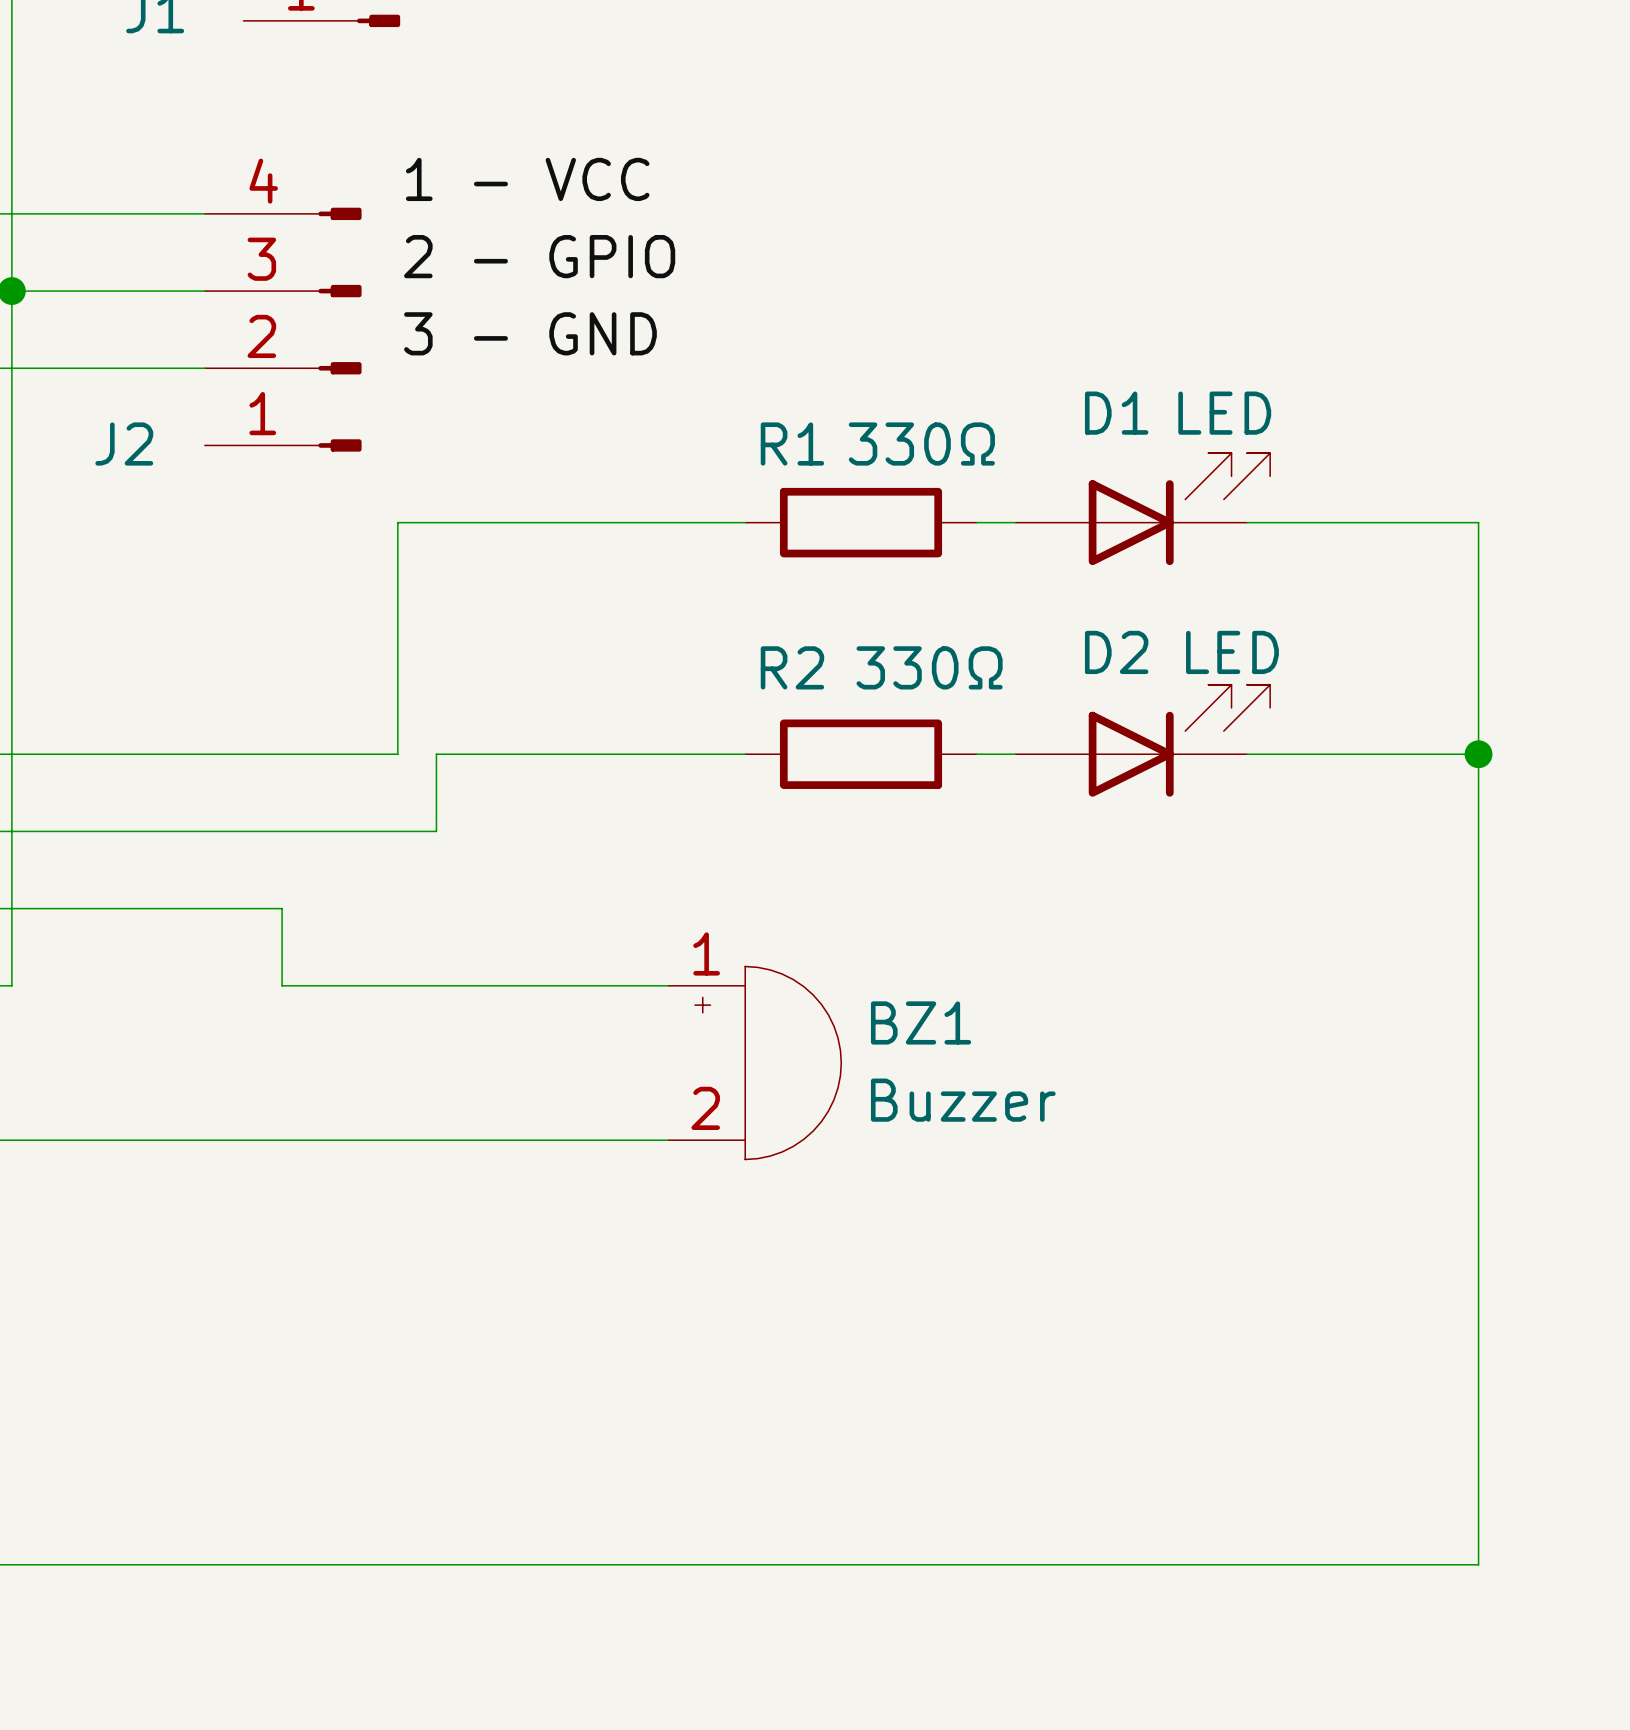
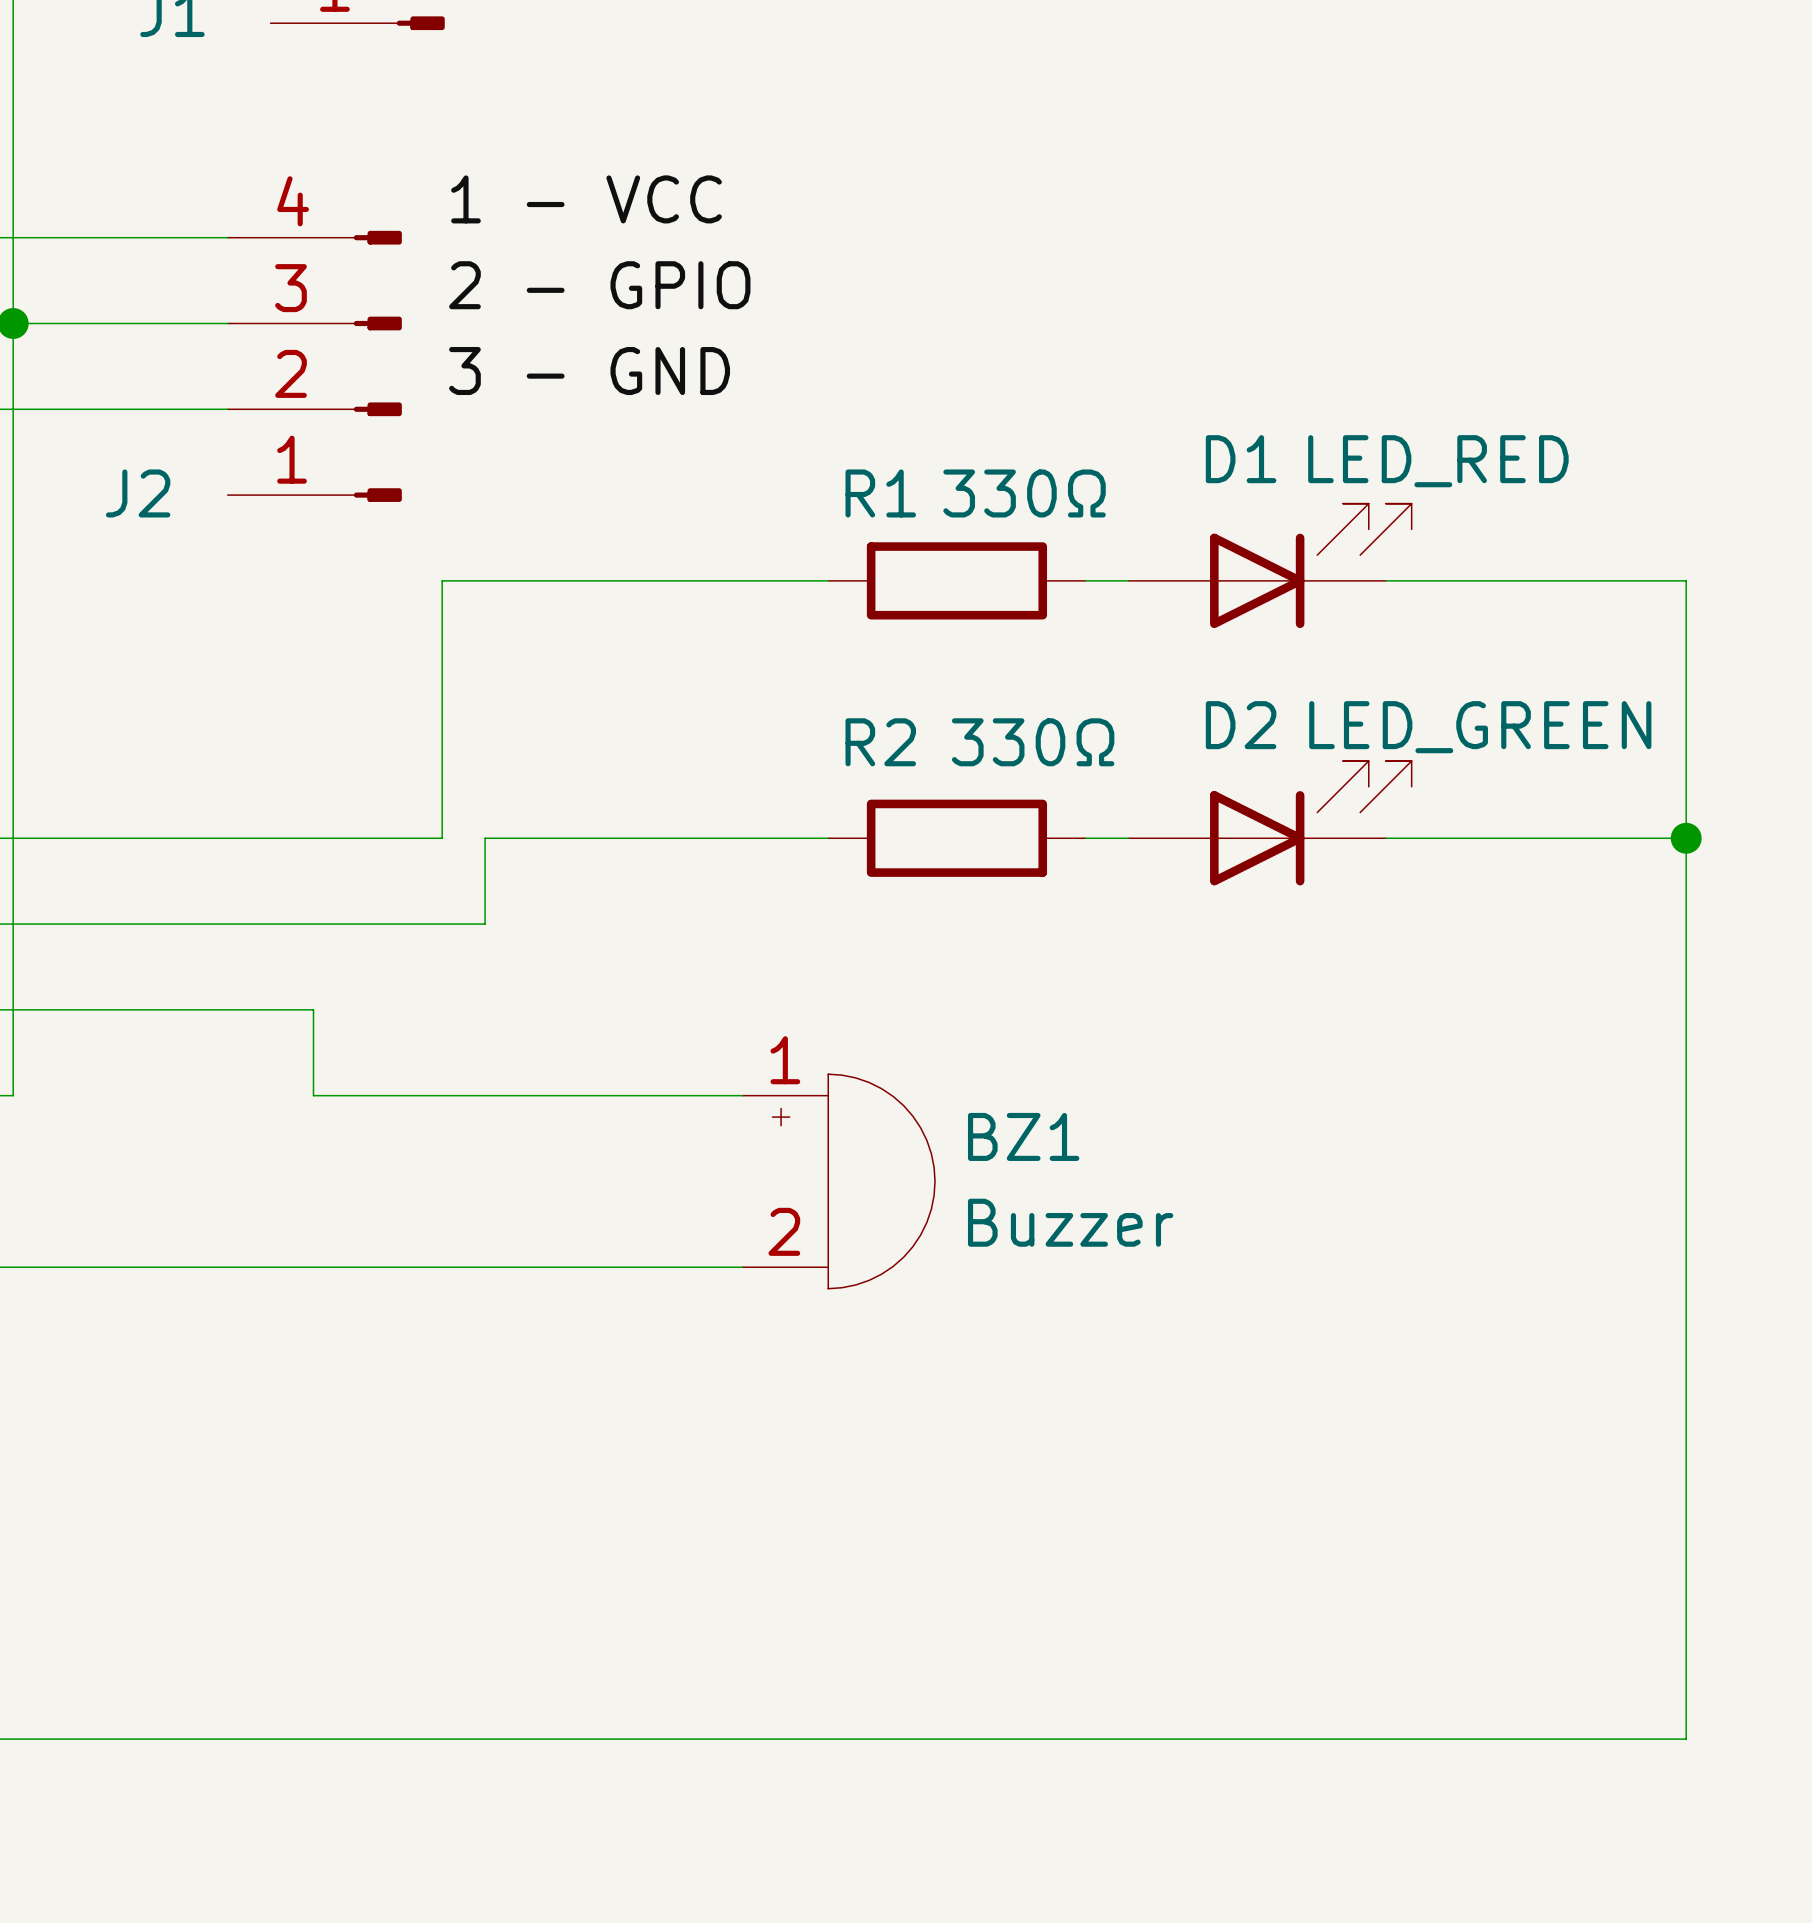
D1 value: LED (1224, 413) -> LED_RED (1438, 461)
wire: (1478, 522) (1478, 1564) -> (1643, 580) (1686, 580) (1686, 1739) (1643, 1739)
D2 value: LED (1232, 652) -> LED_GREEN (1480, 727)
wire: none -> (1643, 838) (1686, 838)
junction position: (1478, 754) -> (1686, 838)

